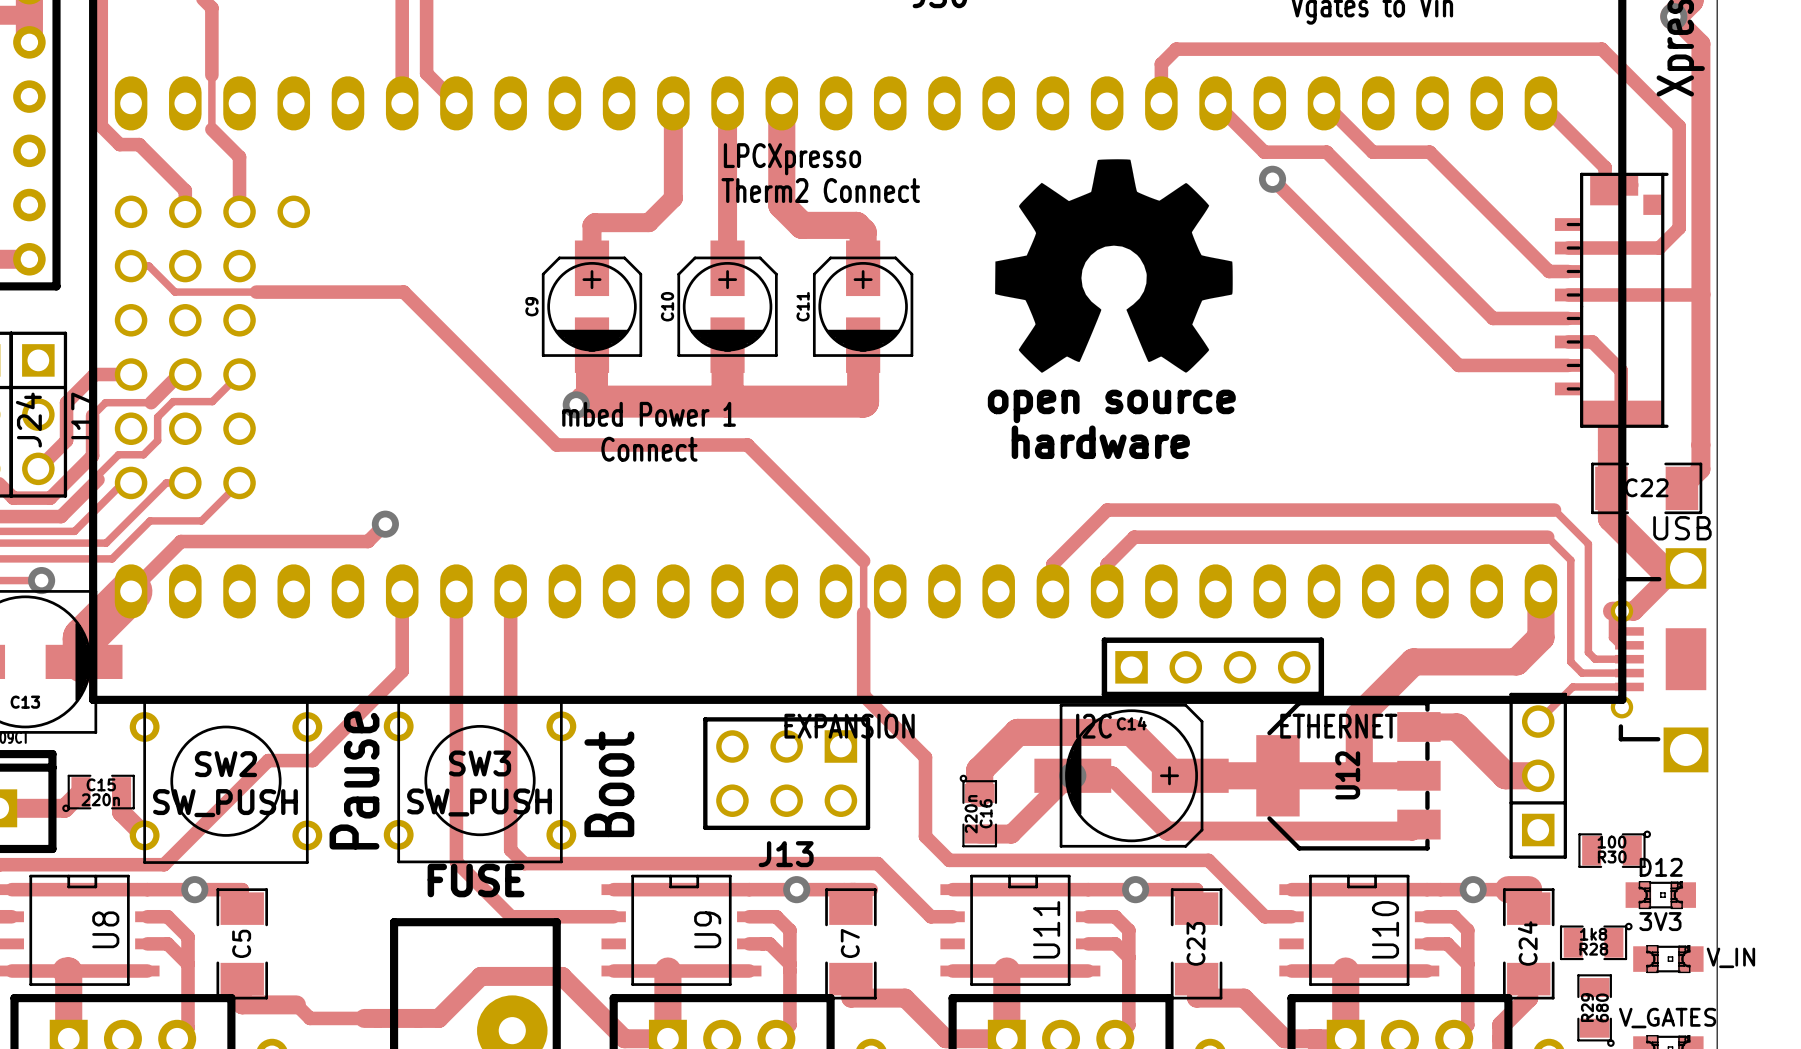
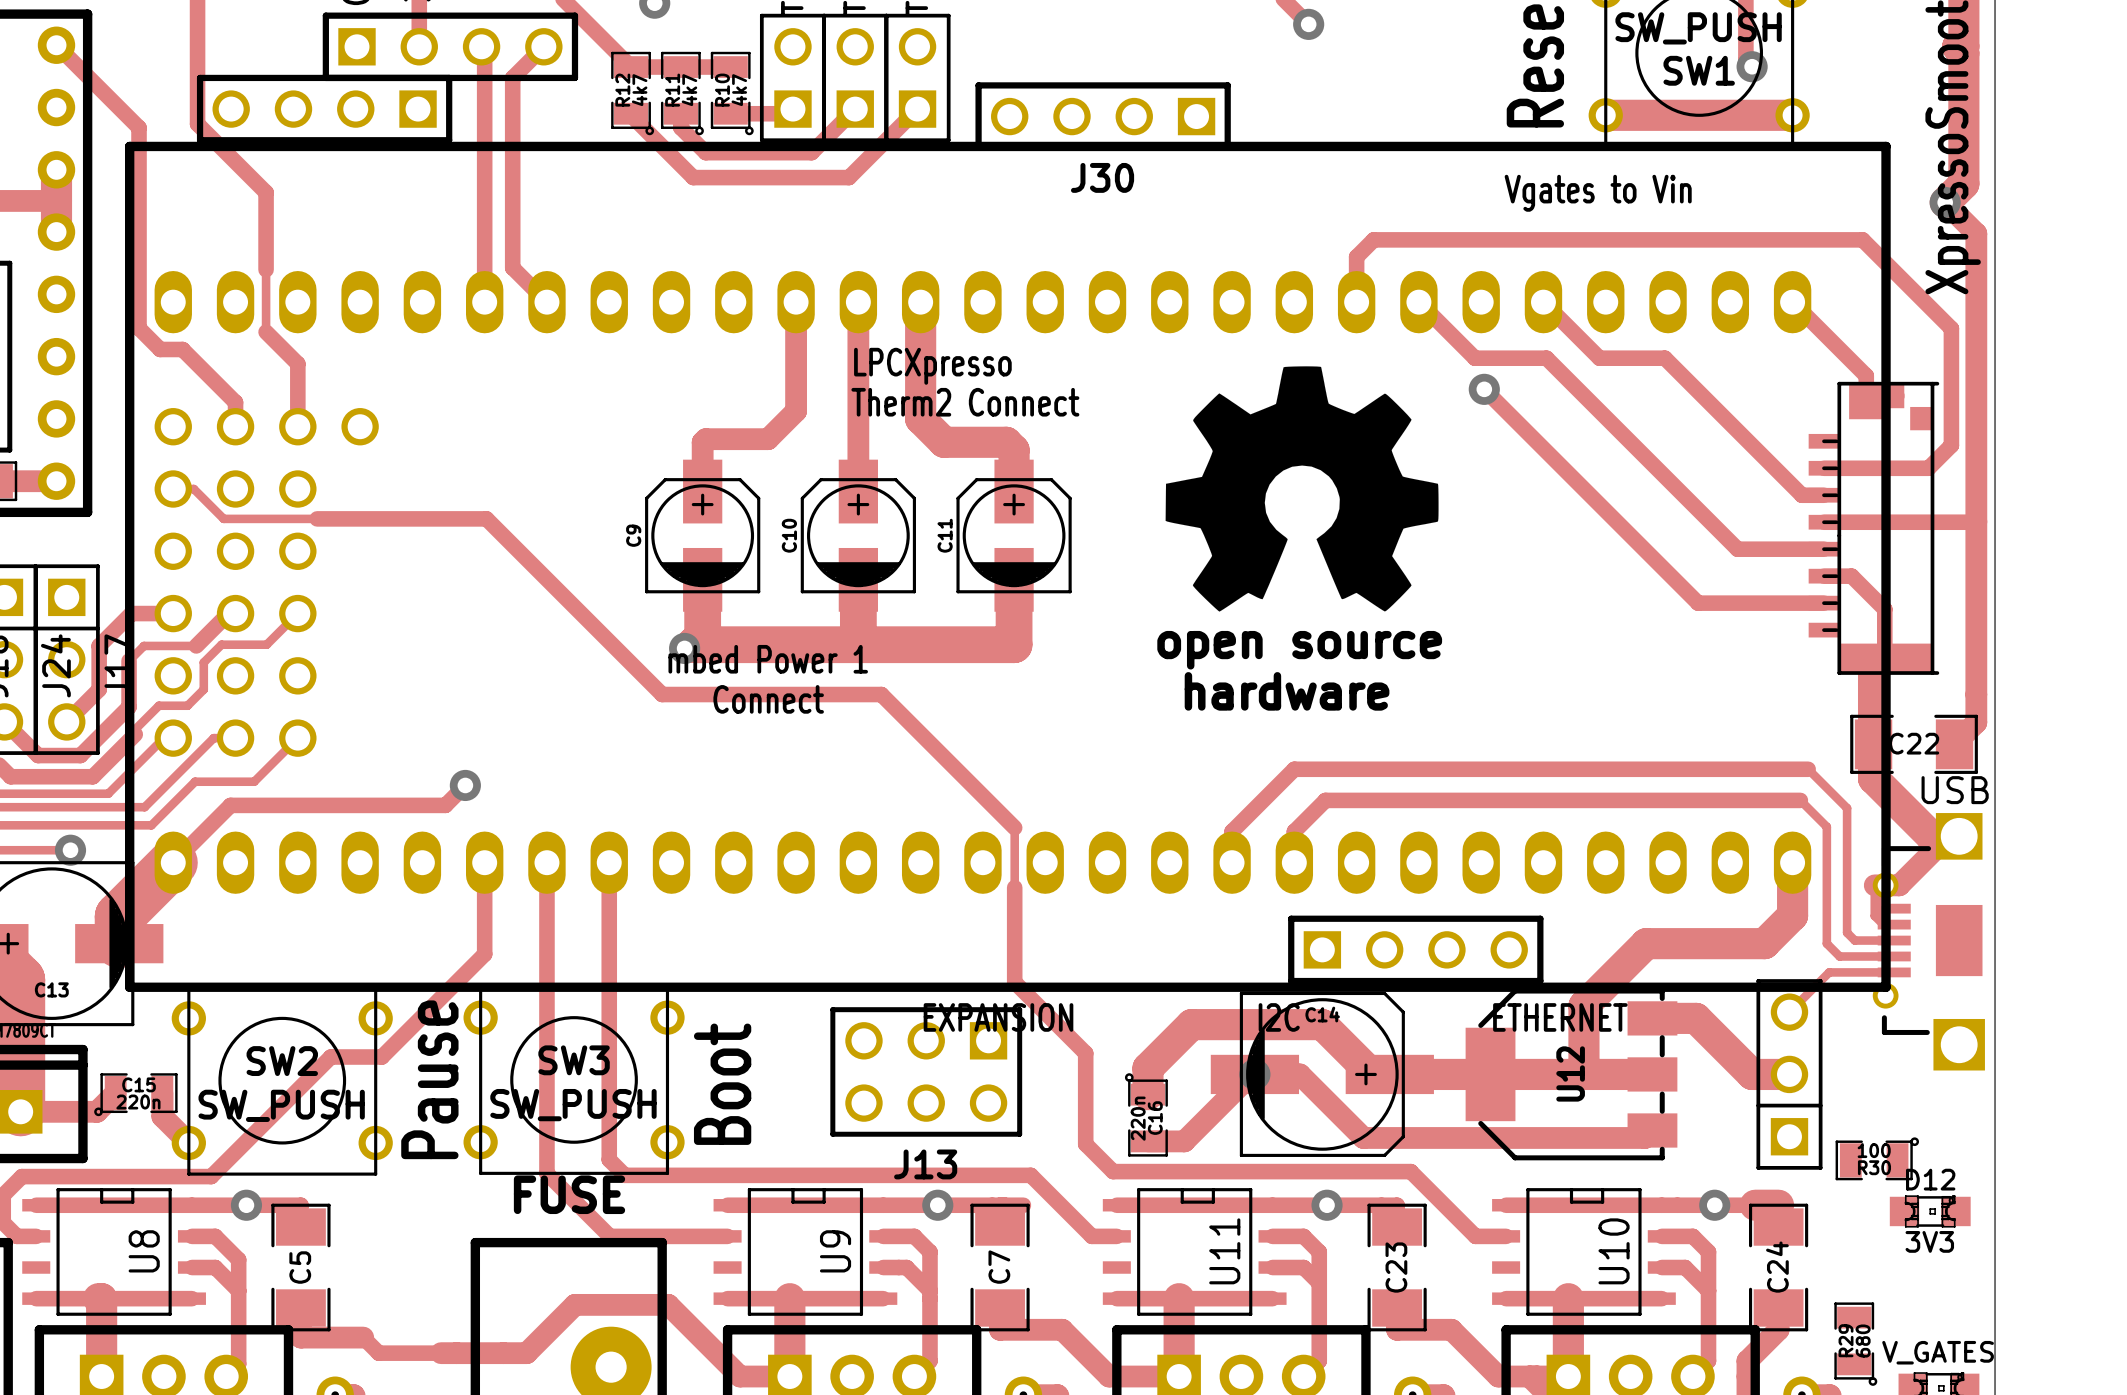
R28: 1k8 (1596, 941) -> none
part: V_IN (1668, 959) -> none

